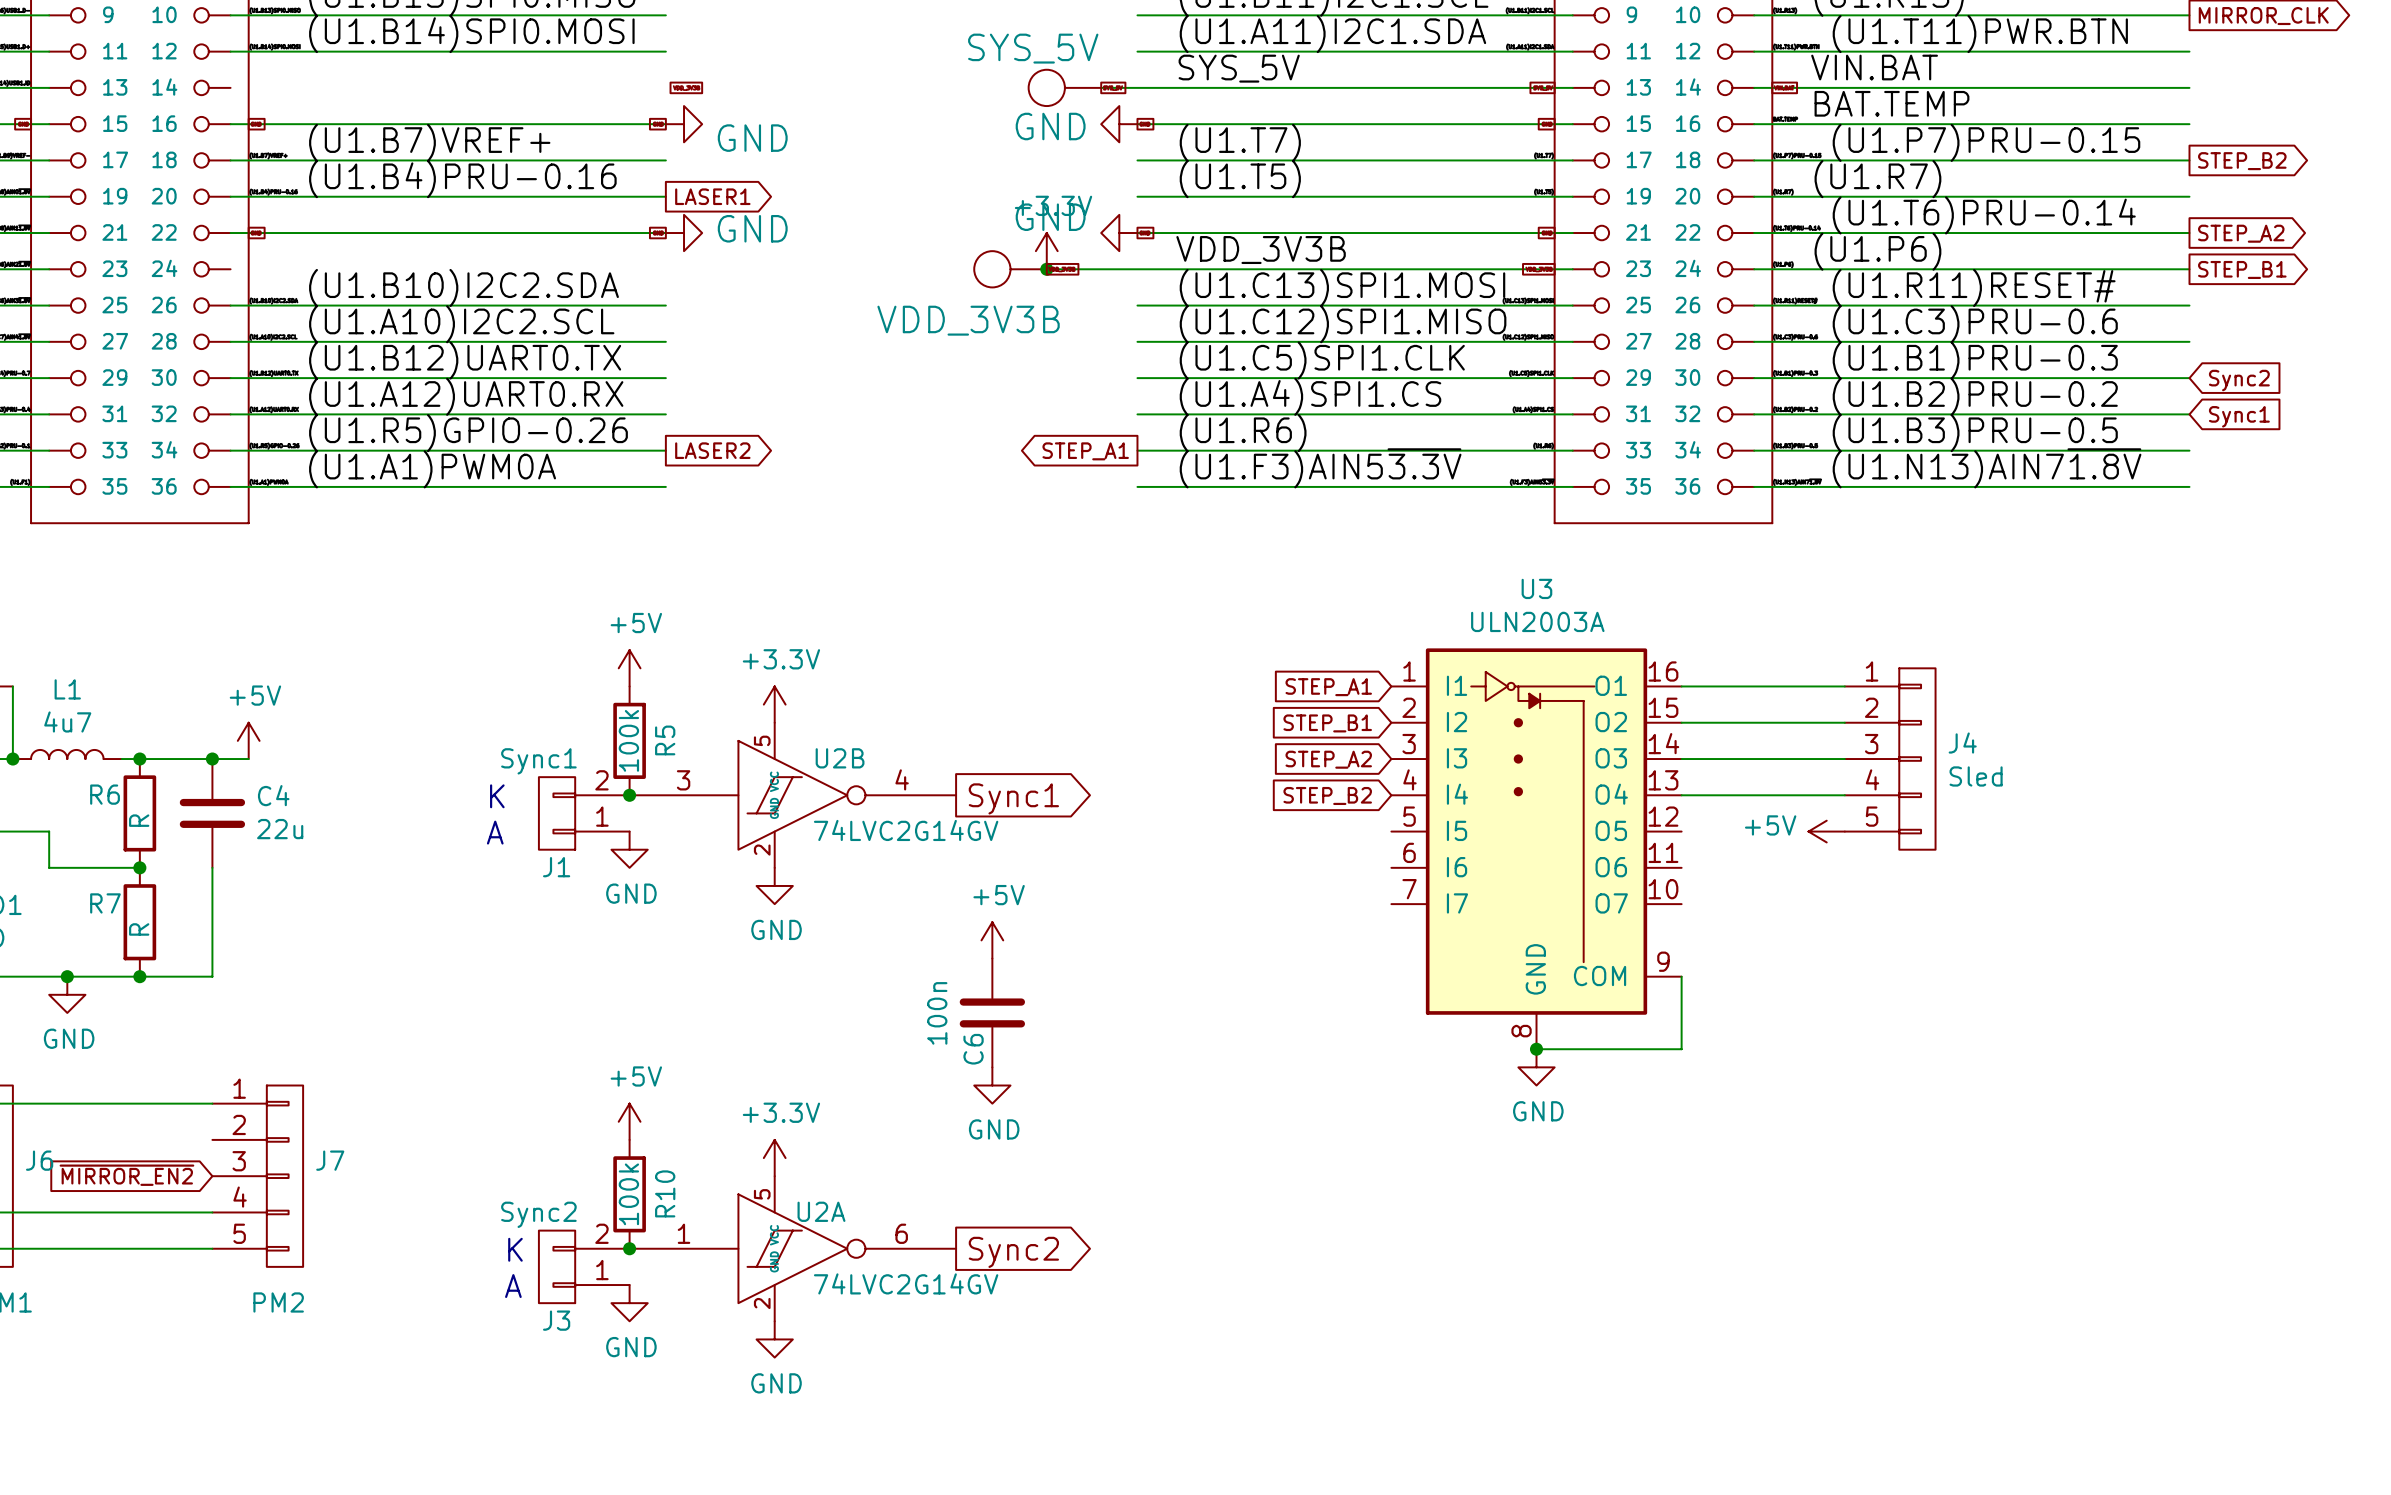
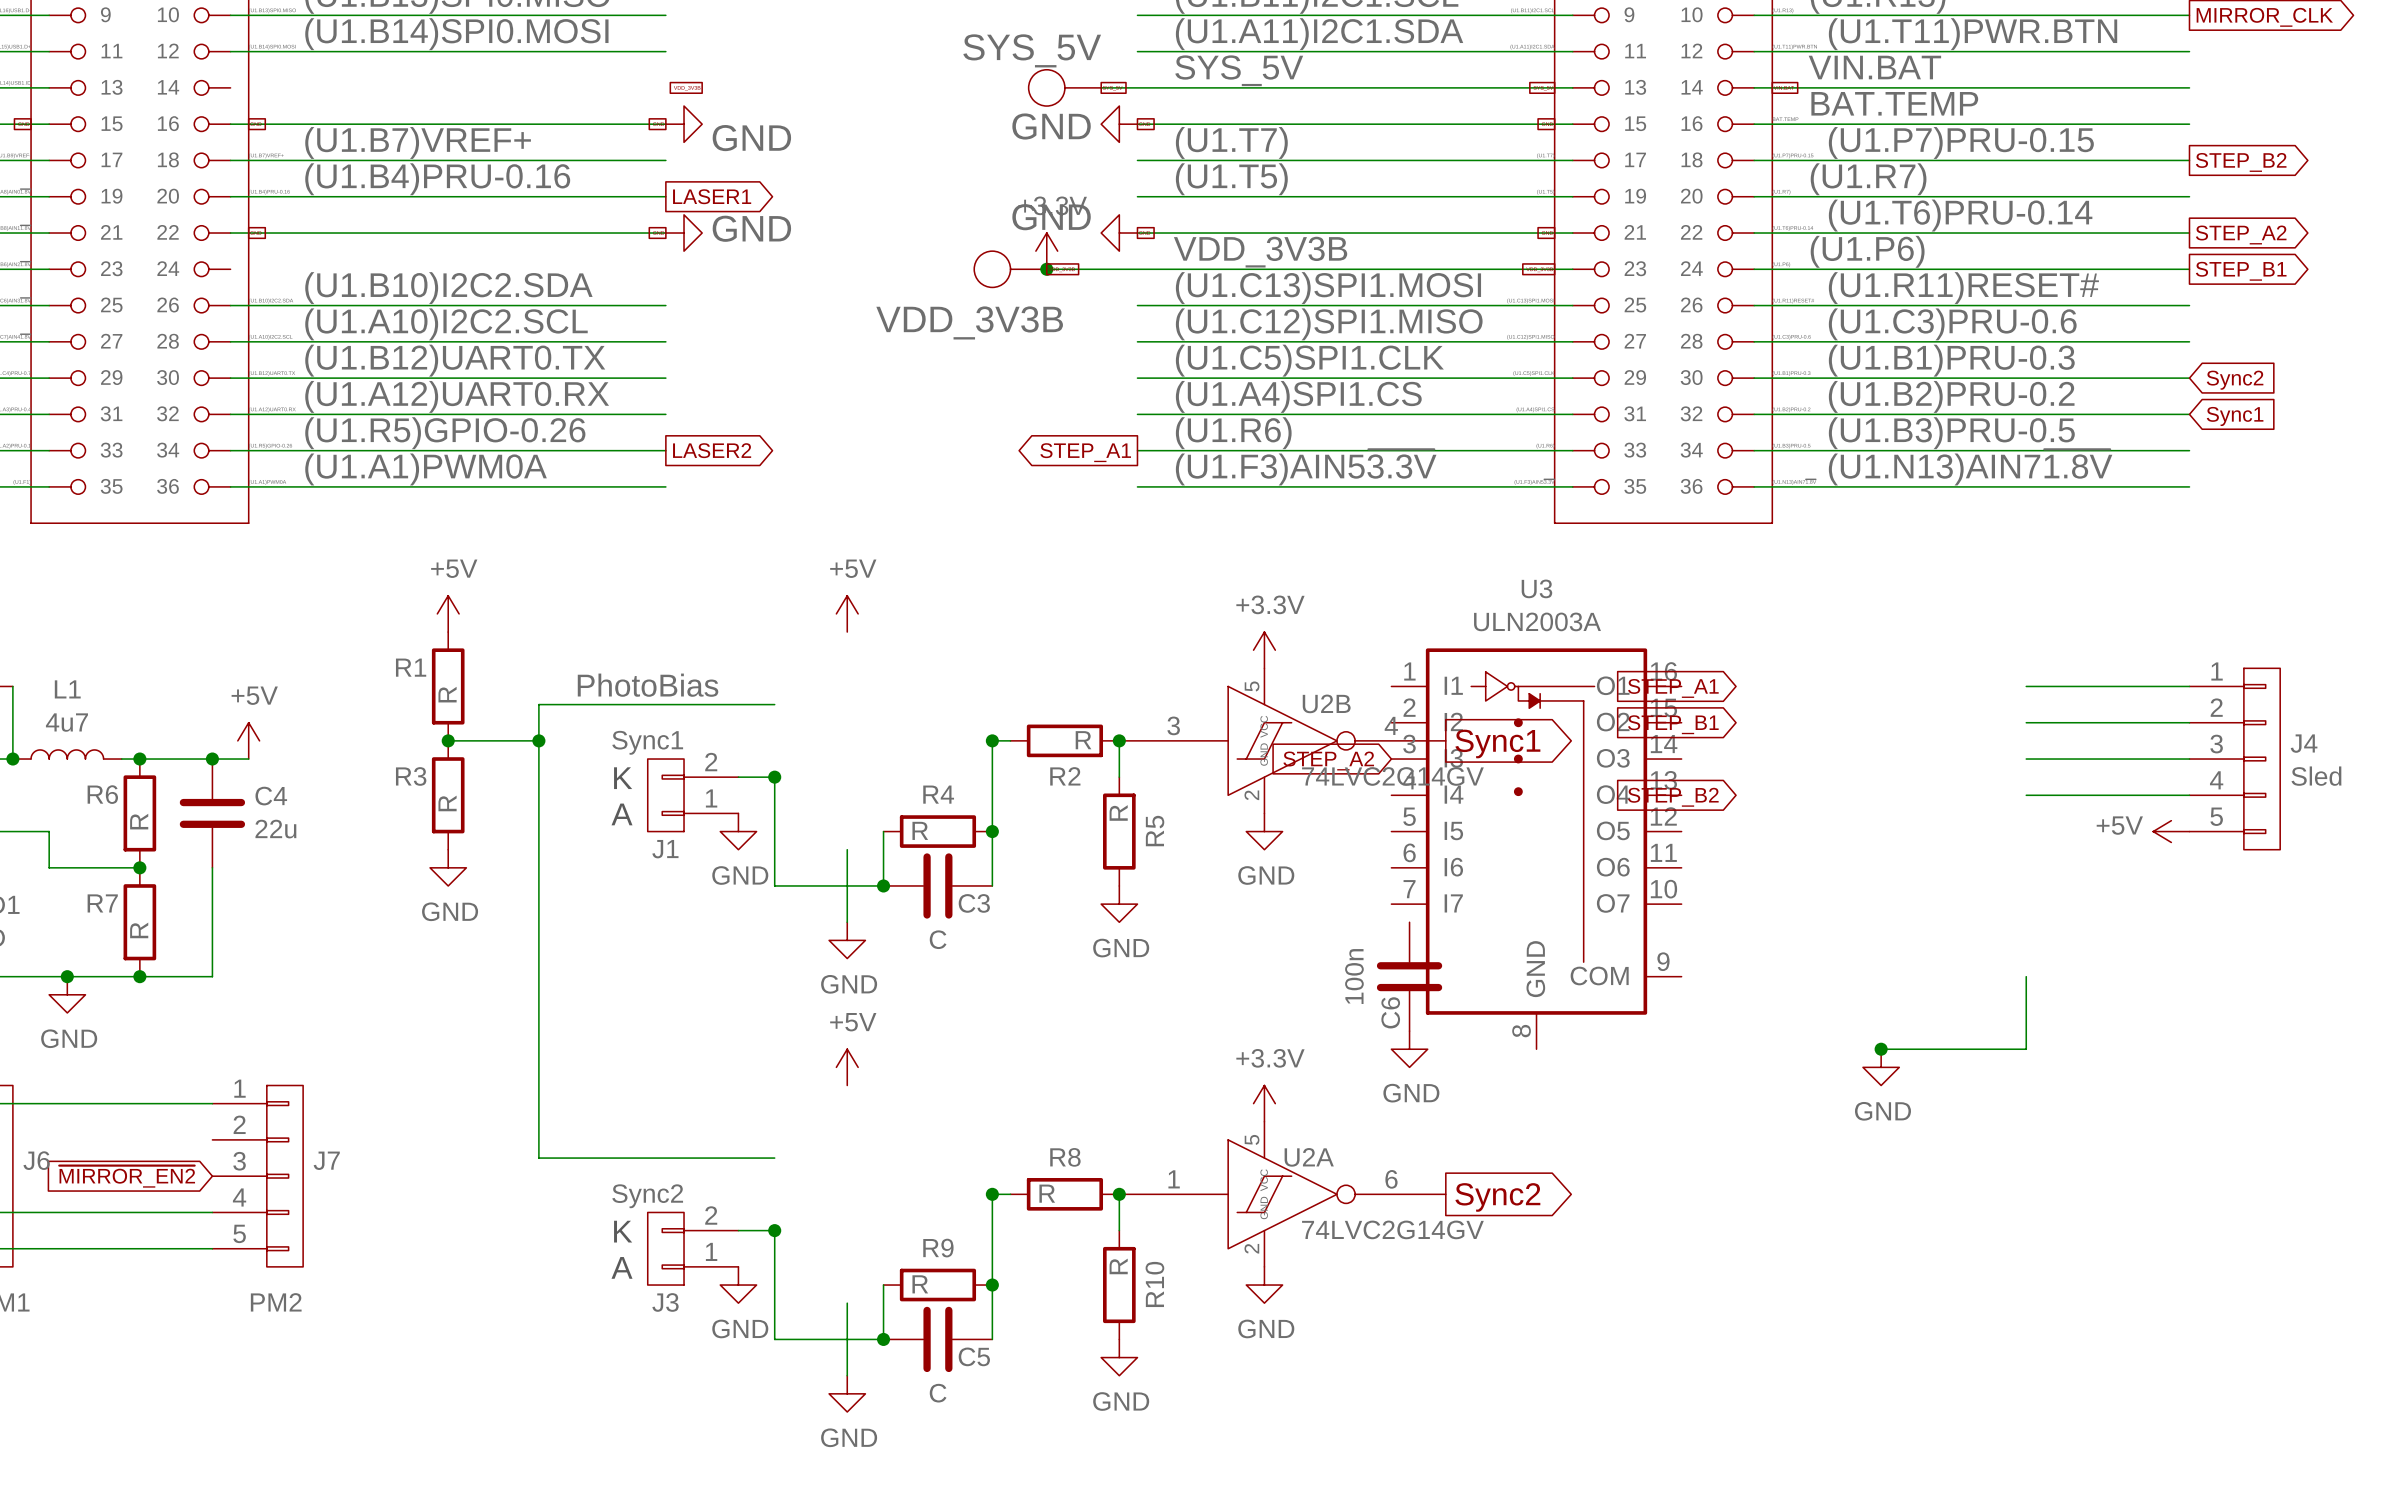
power symbol: none -> +5V (448, 613)
power symbol: none -> +5V (847, 613)
power symbol: none -> +3.3V (1264, 650)
power symbol: +5V (629, 668) -> none
label: none -> PhotoBias (648, 685)
R1: none -> R (448, 686)
wire: (1681, 686) (1844, 686) -> (2026, 686) (2189, 686)
global label position: STEP_A1 (1328, 687) -> STEP_A1 (1673, 688)
wire: none -> (774, 704) (538, 704) (538, 1158) (774, 1158)
power symbol: +3.3V (774, 704) -> none
wire: (1681, 722) (1844, 722) -> (2026, 722) (2189, 722)
global label position: STEP_B1 (1327, 723) -> STEP_B1 (1673, 724)
wire: none -> (448, 740) (538, 740)
junction: none -> (448, 740)
junction: none -> (538, 740)
R5 value: 100k (628, 740) -> R (1118, 812)
R5 position: (629, 740) -> (1119, 831)
junction: none -> (992, 740)
wire: none -> (1010, 740) (992, 740) (992, 885)
R2: none -> R (1064, 740)
wire: none -> (1119, 740) (1119, 777)
junction: none -> (1119, 740)
global label: none -> Sync1 (1497, 743)
wire: (1681, 759) (1844, 759) -> (2026, 759) (2189, 759)
J4 position: (1890, 759) -> (2234, 759)
wire: none -> (738, 777) (774, 777) (774, 885) (883, 885) (883, 831)
junction: none -> (774, 777)
R3: none -> R (448, 795)
junction: (629, 795) -> none
U2B position: (792, 795) -> (1282, 740)
global label position: STEP_B2 (1327, 795) -> STEP_B2 (1673, 797)
wire: (1681, 795) (1844, 795) -> (2026, 795) (2189, 795)
text position: K (497, 796) -> K (623, 778)
global label: Sync1 (1013, 798) -> none
J1 position: (584, 813) -> (693, 795)
power symbol: none -> GND (738, 831)
R4: none -> R (937, 831)
junction: none -> (992, 831)
power symbol: none -> GND (1264, 831)
power symbol position: +5V (1826, 831) -> +5V (2171, 831)
text position: A (495, 832) -> A (622, 814)
power symbol: GND (629, 849) -> none
wire: none -> (847, 849) (847, 922)
power symbol: none -> GND (448, 867)
power symbol: GND (774, 885) -> none
junction: none -> (883, 885)
C3: none -> C (937, 885)
power symbol: none -> GND (1119, 904)
power symbol: none -> GND (847, 940)
power symbol: +5V (992, 940) -> none
wire: (1681, 976) (1681, 1049) (1536, 1049) -> (2026, 976) (2026, 1049) (1881, 1049)
C6 position: (992, 1012) -> (1409, 976)
junction: (1536, 1049) -> none
junction: none -> (1881, 1049)
power symbol: none -> +5V (847, 1067)
power symbol position: GND (1536, 1067) -> GND (1409, 1049)
power symbol: none -> GND (1881, 1067)
power symbol: GND (992, 1085) -> none
power symbol: none -> +3.3V (1264, 1103)
power symbol: +5V (629, 1121) -> none
power symbol: +3.3V (774, 1158) -> none
R10 value: 100k (628, 1194) -> R (1118, 1266)
R10 position: (629, 1194) -> (1119, 1285)
junction: none -> (992, 1194)
wire: none -> (1010, 1194) (992, 1194) (992, 1339)
R8: none -> R (1064, 1194)
wire: none -> (1119, 1194) (1119, 1230)
junction: none -> (1119, 1194)
global label: none -> Sync2 (1497, 1197)
wire: none -> (738, 1230) (774, 1230) (774, 1339) (883, 1339) (883, 1285)
junction: none -> (774, 1230)
junction: (629, 1248) -> none
U2A position: (792, 1248) -> (1282, 1194)
text position: K (515, 1249) -> K (623, 1231)
global label: Sync2 (1013, 1252) -> none
J3 position: (584, 1266) -> (693, 1248)
power symbol: none -> GND (738, 1285)
R9: none -> R (937, 1285)
junction: none -> (992, 1285)
power symbol: none -> GND (1264, 1285)
text position: A (513, 1286) -> A (622, 1267)
power symbol: GND (629, 1303) -> none
wire: none -> (847, 1303) (847, 1375)
power symbol: GND (774, 1339) -> none
junction: none -> (883, 1339)
C5: none -> C (937, 1339)
power symbol: none -> GND (1119, 1357)
power symbol: none -> GND (847, 1393)

